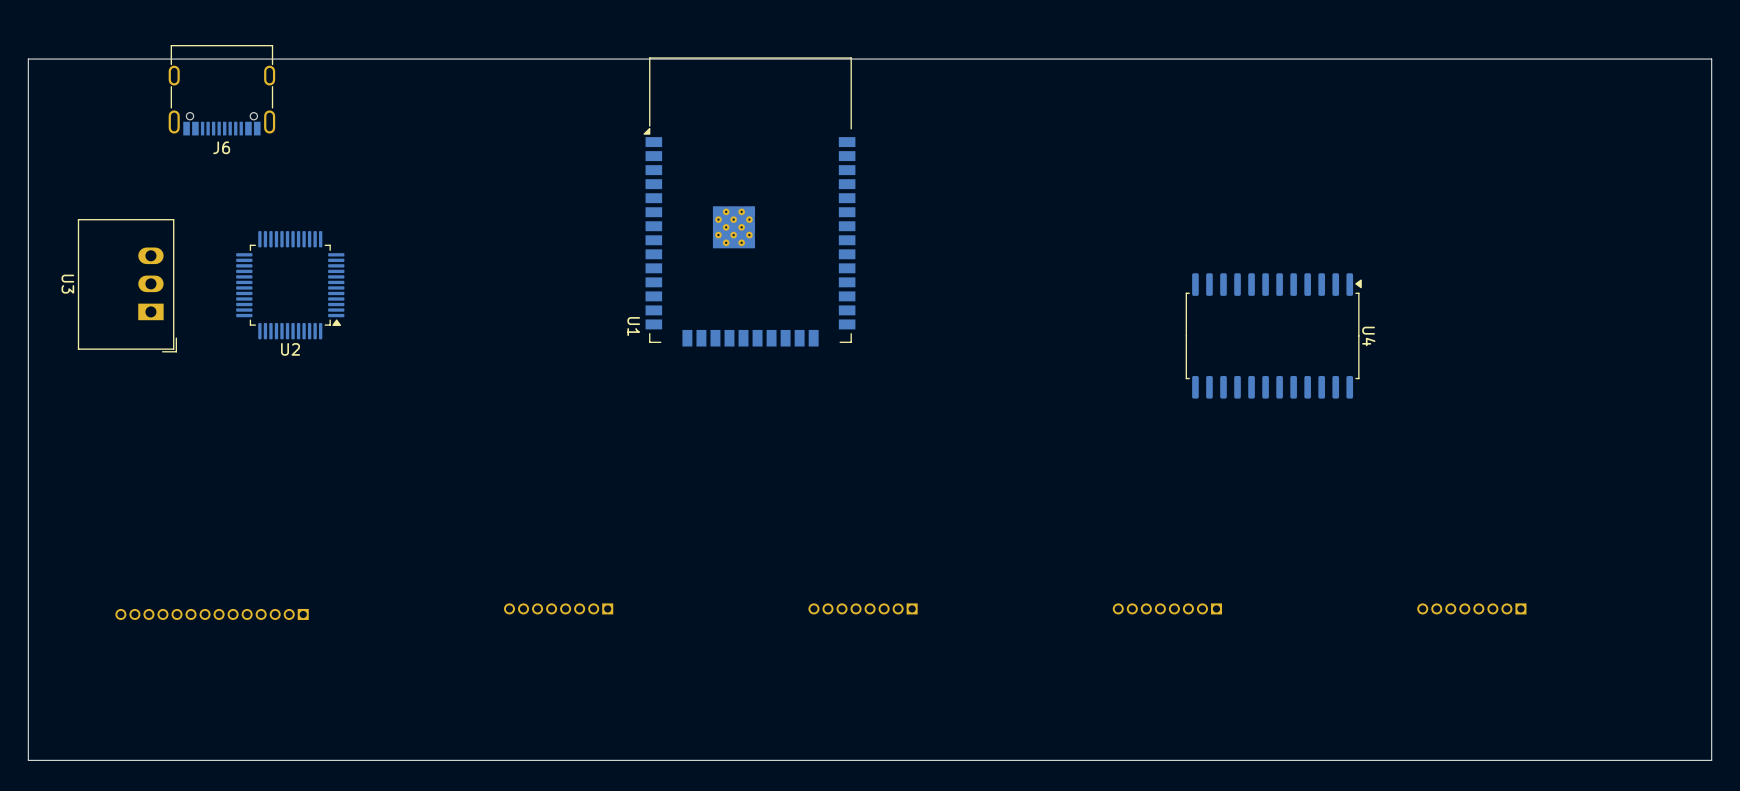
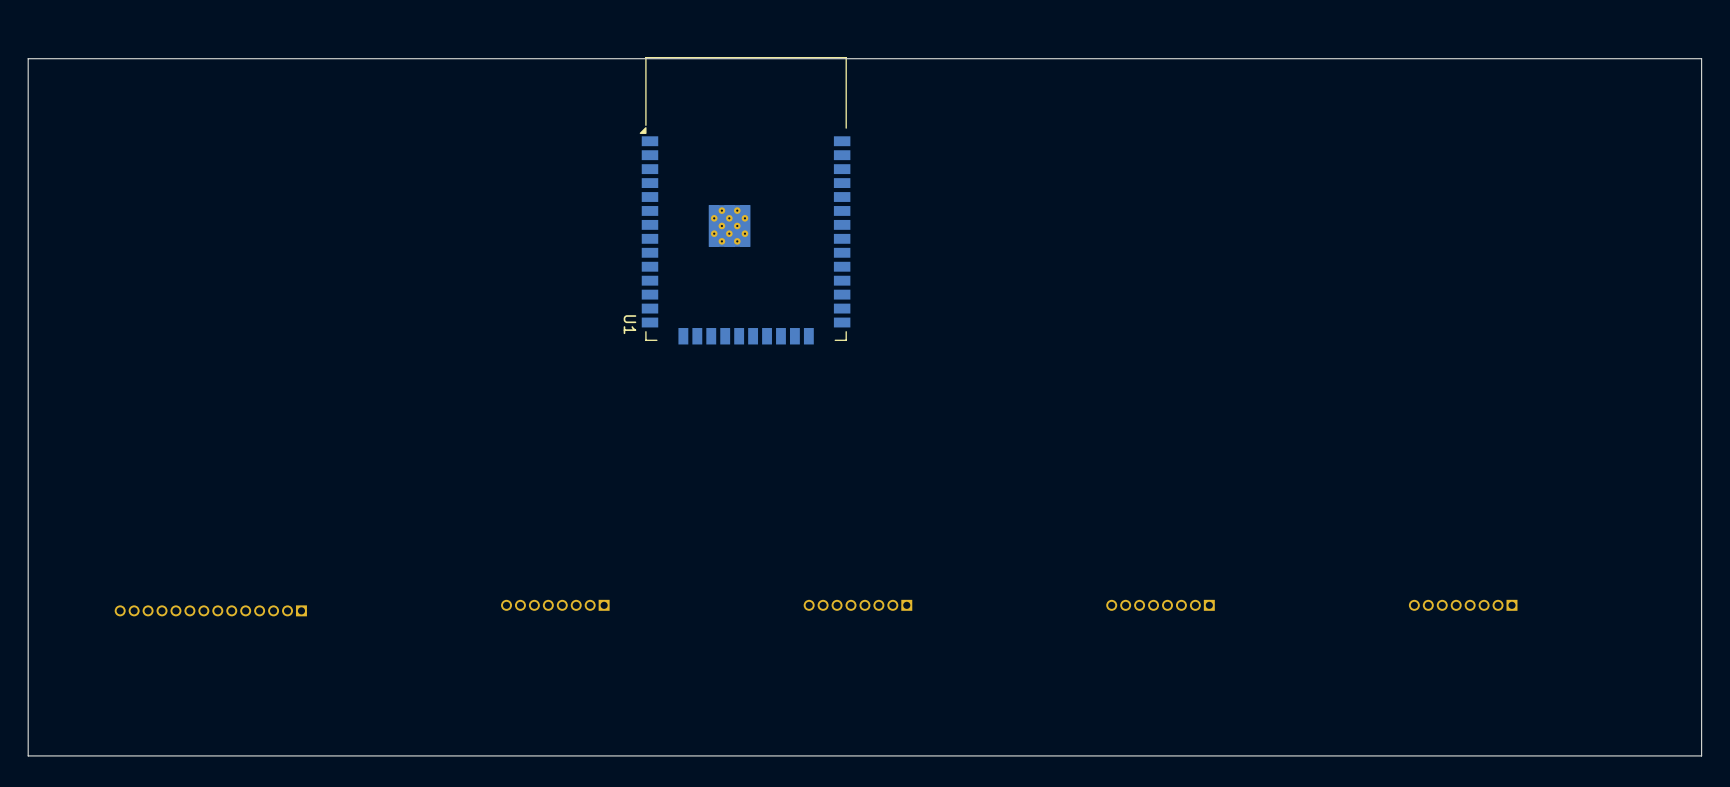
J6: (221, 90) -> none
U3: (127, 285) -> none
U2: (290, 285) -> none
U4: (1273, 335) -> none

